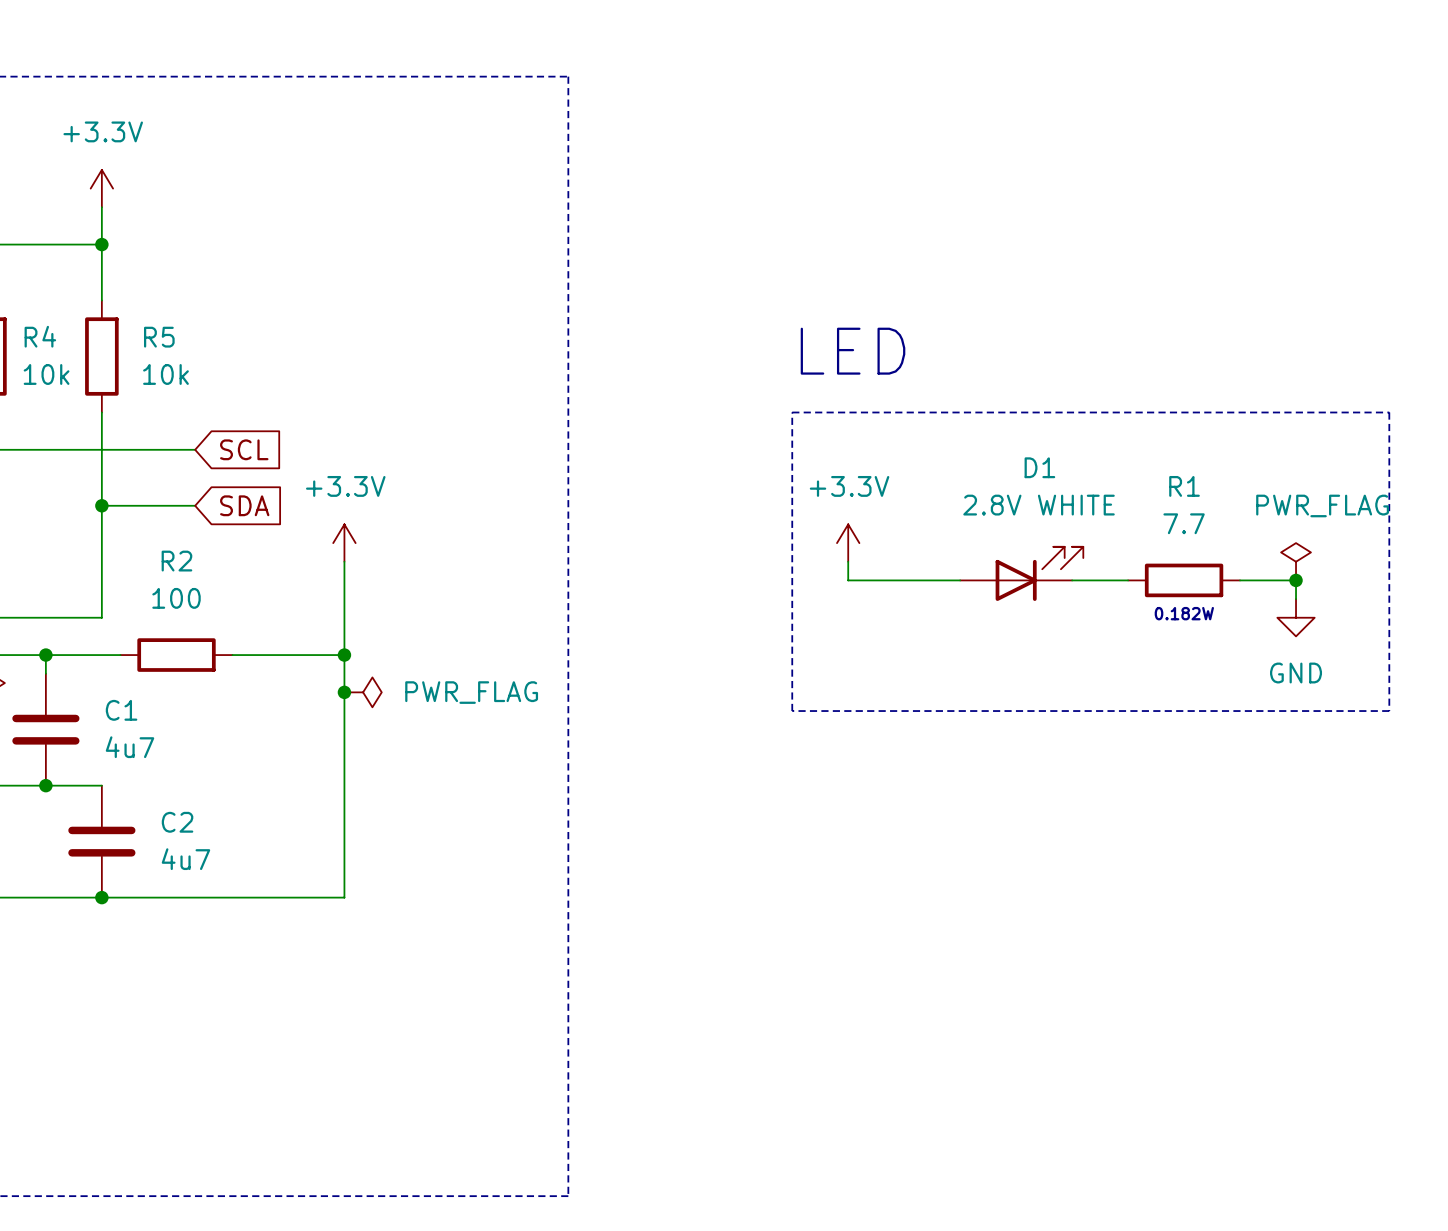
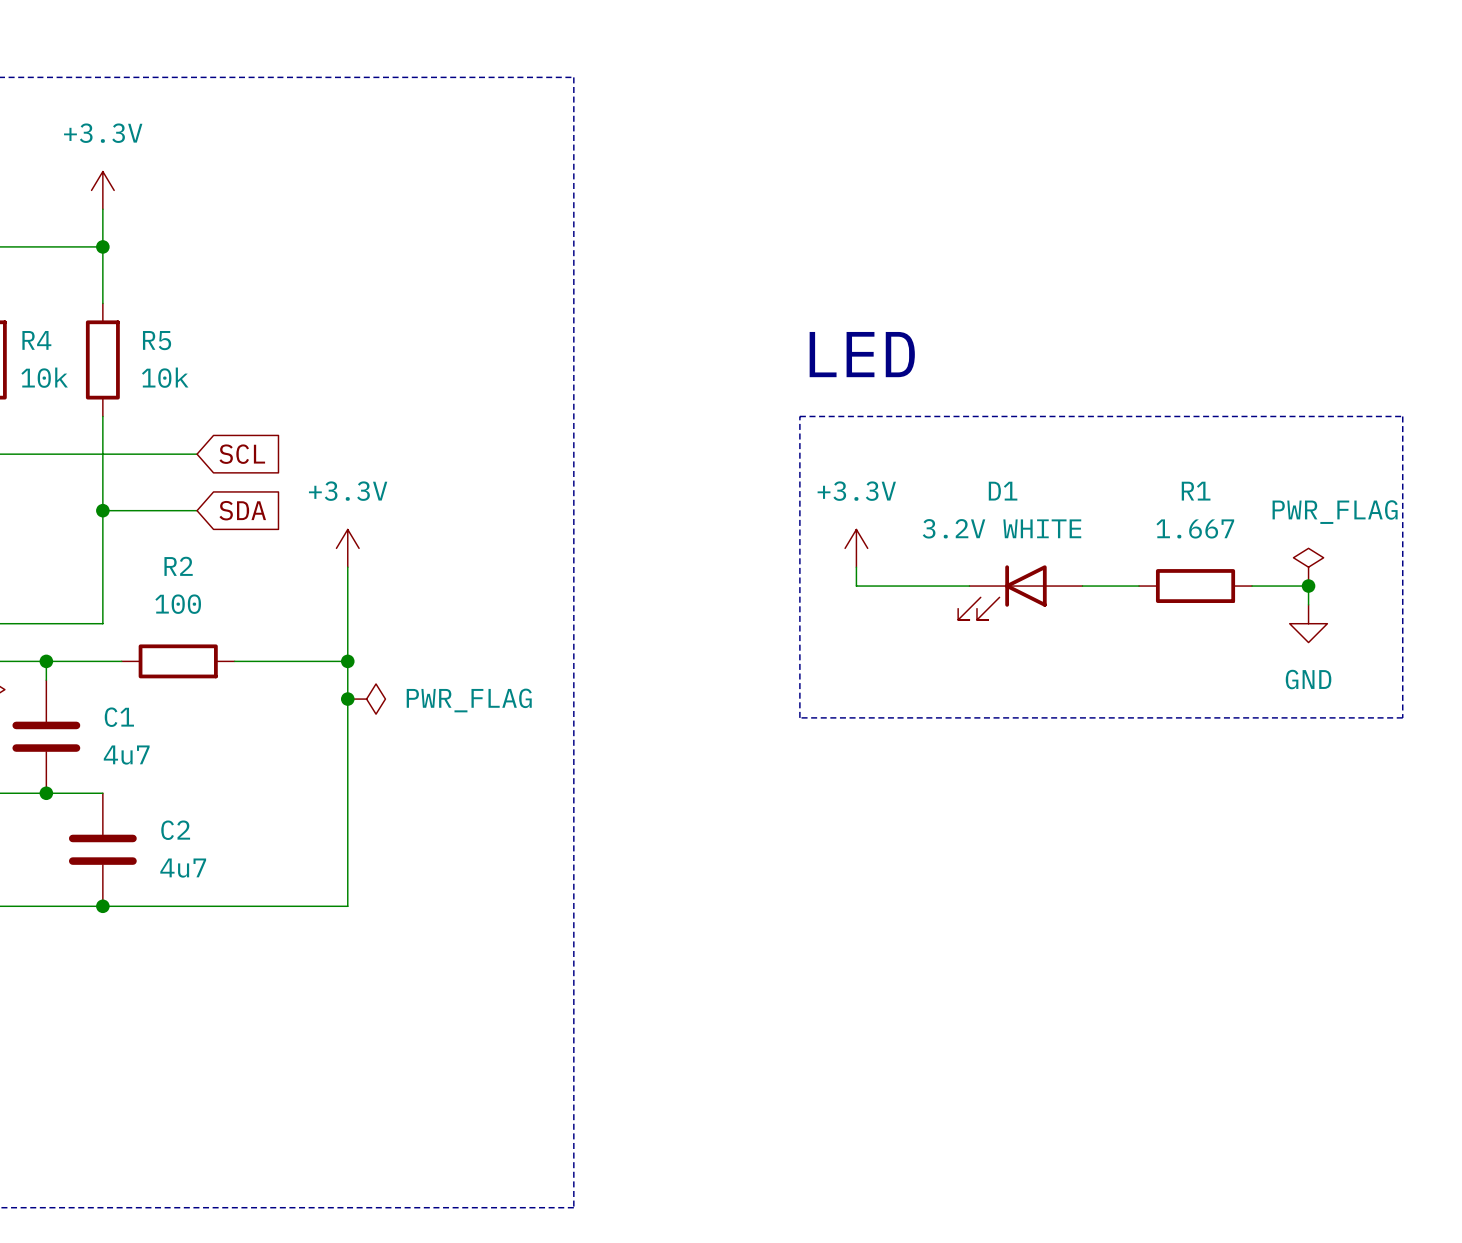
D1 name position: D1 (1039, 467) -> D1 (1003, 491)
D1 value: 2.8V WHITE (1039, 505) -> 3.2V WHITE (1001, 528)
R1 value: 7.7 (1184, 523) -> 1.667 (1195, 528)
D1 rotation: 0° (1039, 573) -> 180° (1002, 592)
text: 0.182W (1184, 613) -> none

